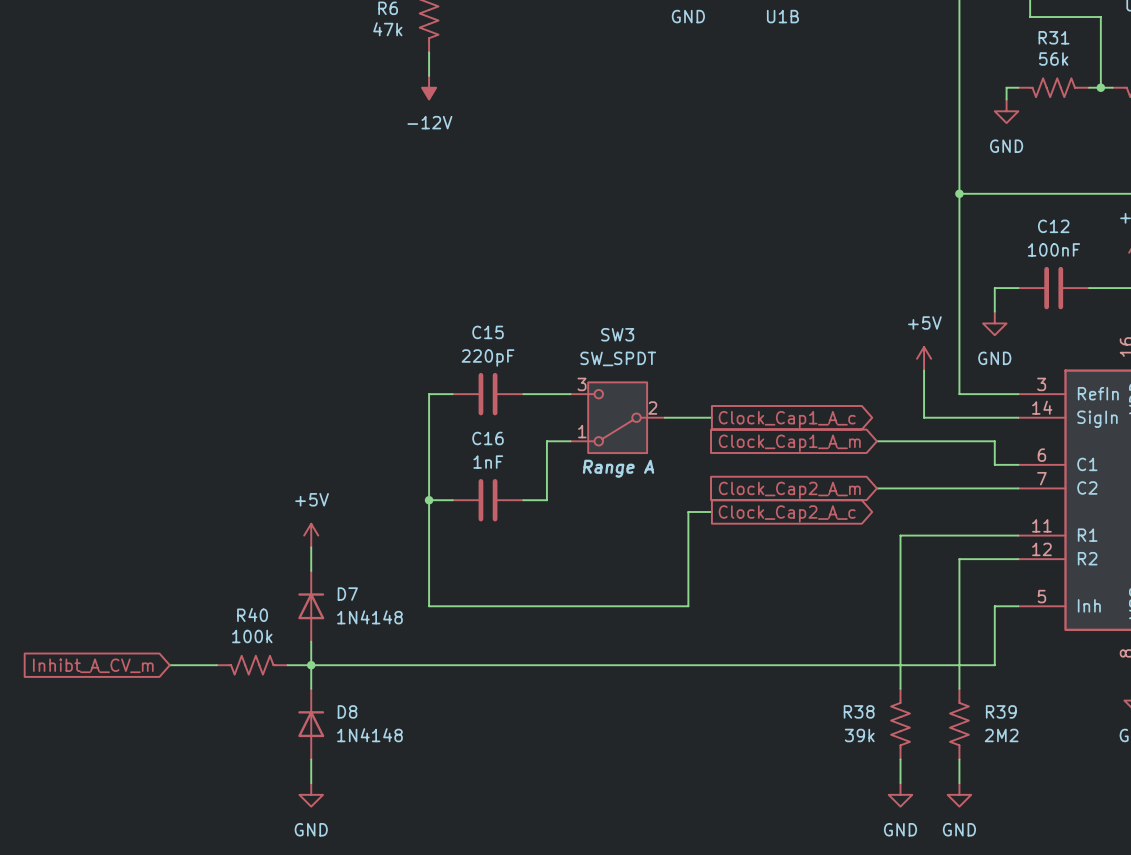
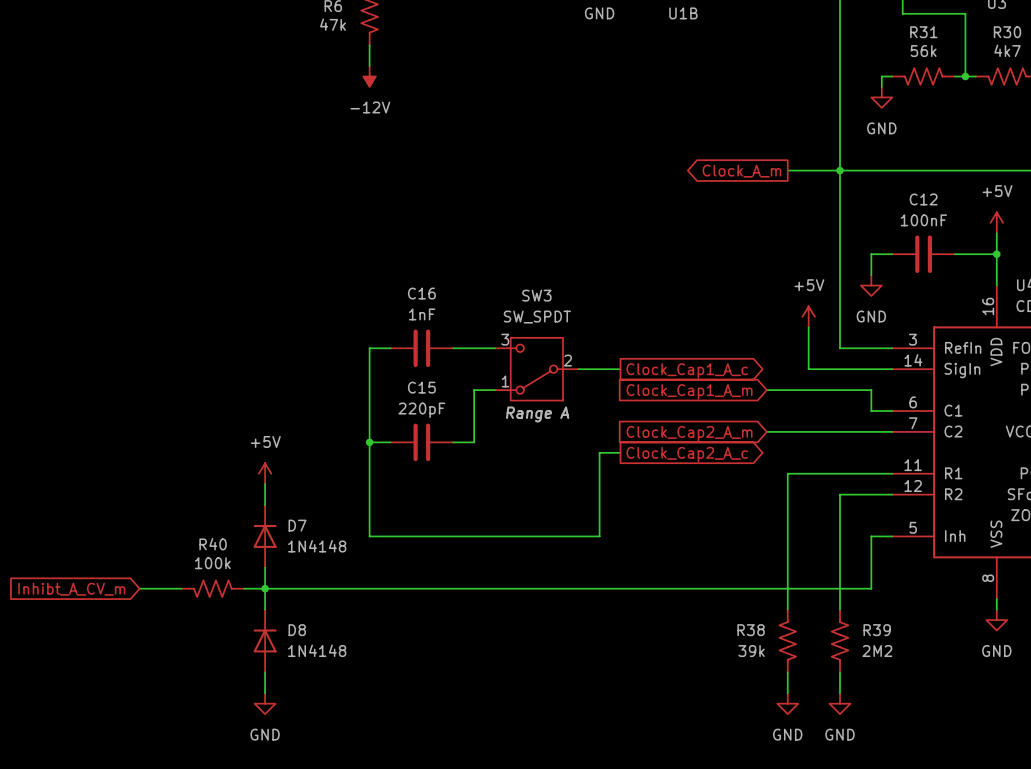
wire: none -> (787, 170) (840, 170)
global label: none -> Clock_A_m (741, 171)
C15 name: C15 (488, 332) -> C16 (421, 293)
C15 value: 220pF (488, 357) -> 1nF (422, 314)
C16 name: C16 (488, 438) -> C15 (421, 387)
C16 value: 1nF (488, 462) -> 220pF (421, 410)

